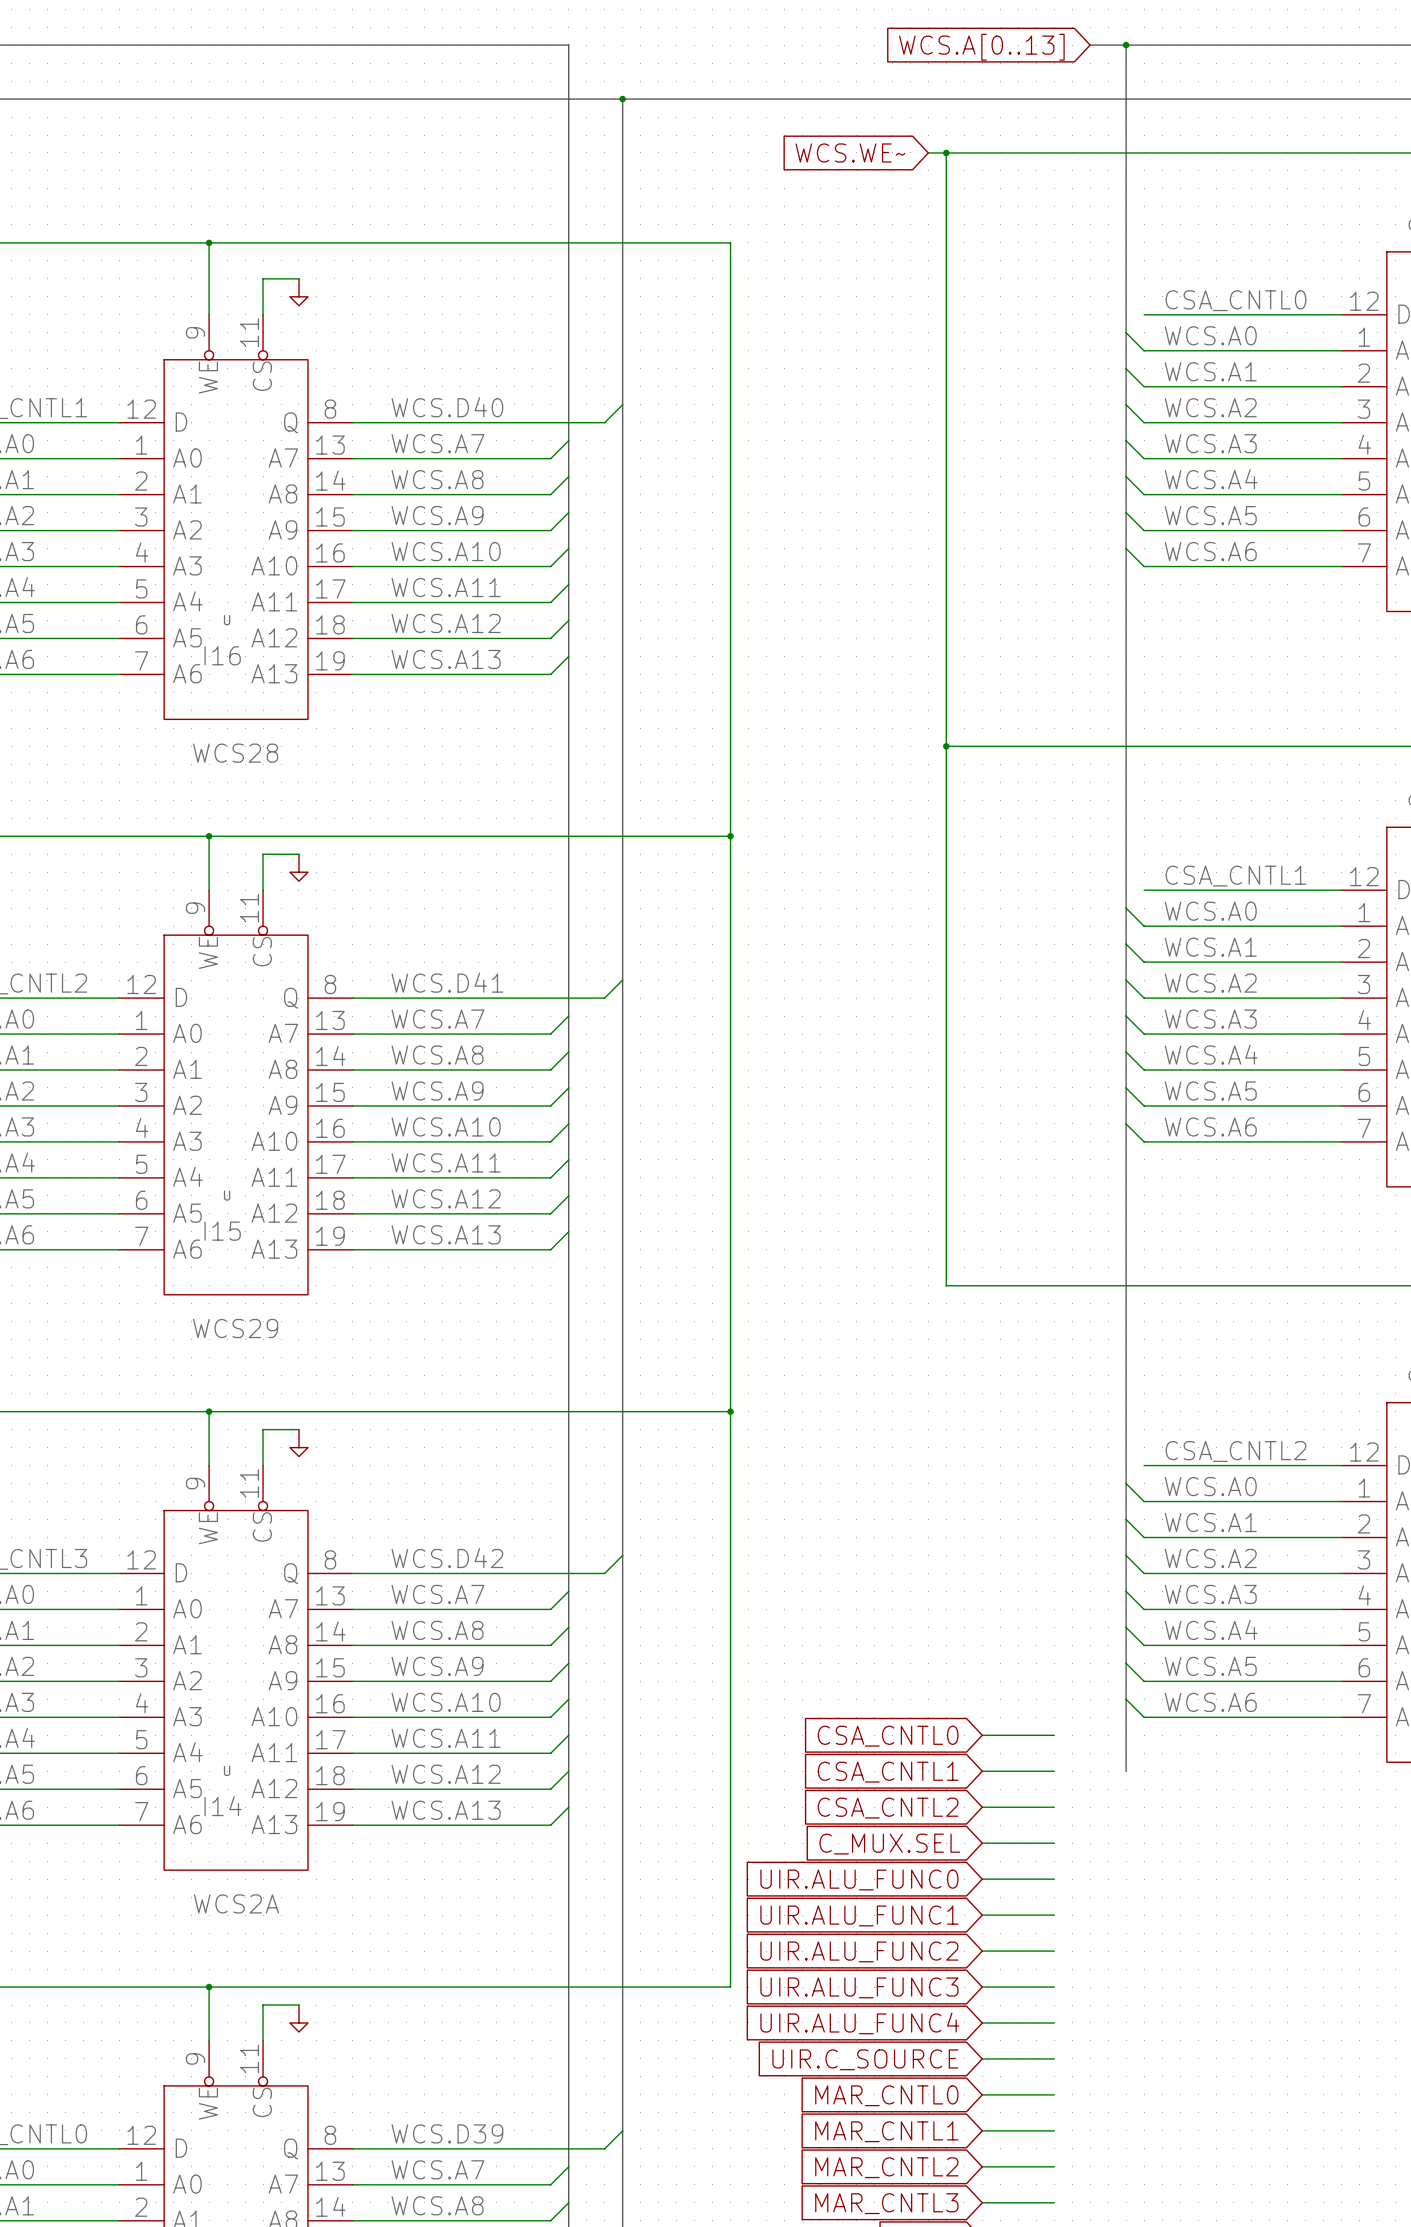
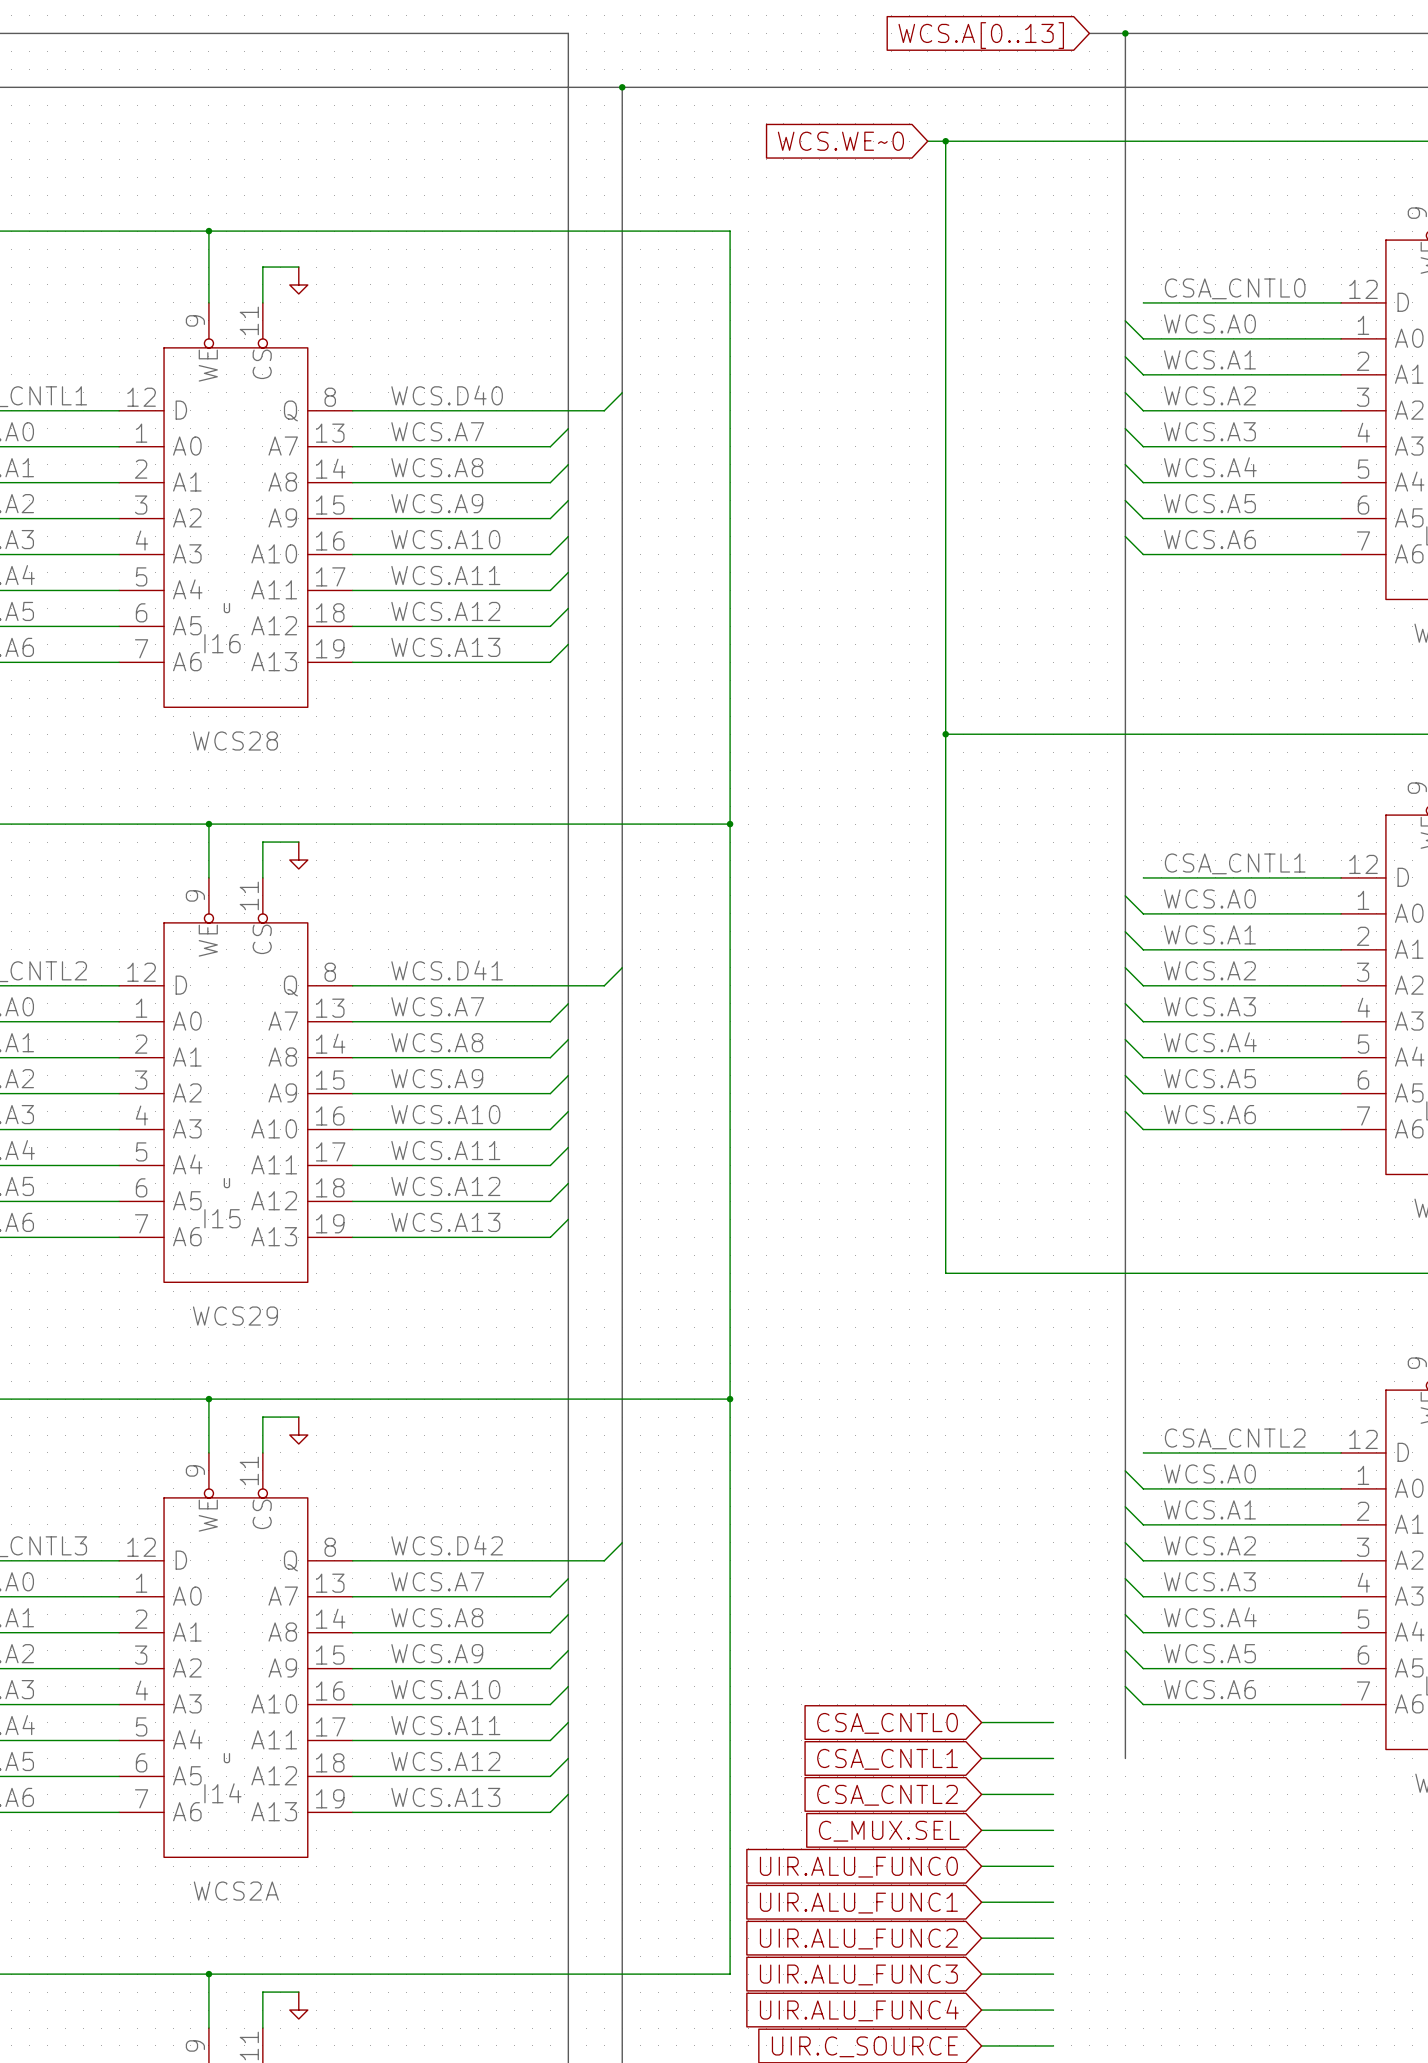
global label: WCS.WE~ (850, 152) -> WCS.WE~0 (840, 141)

